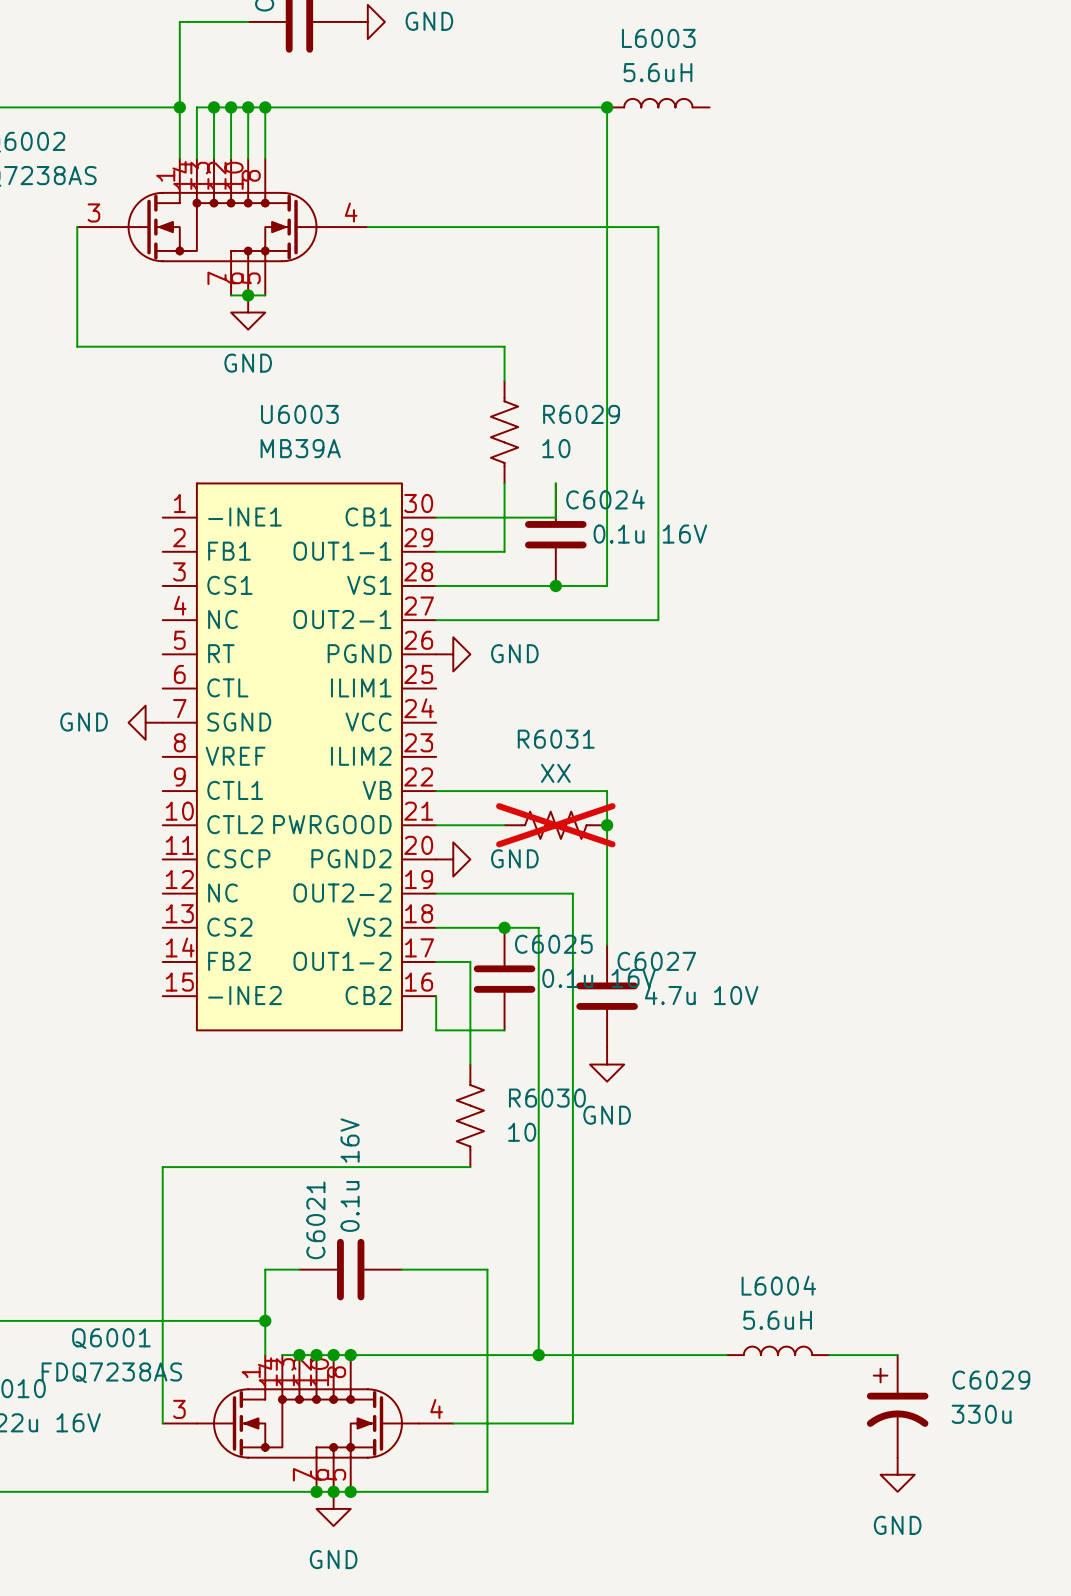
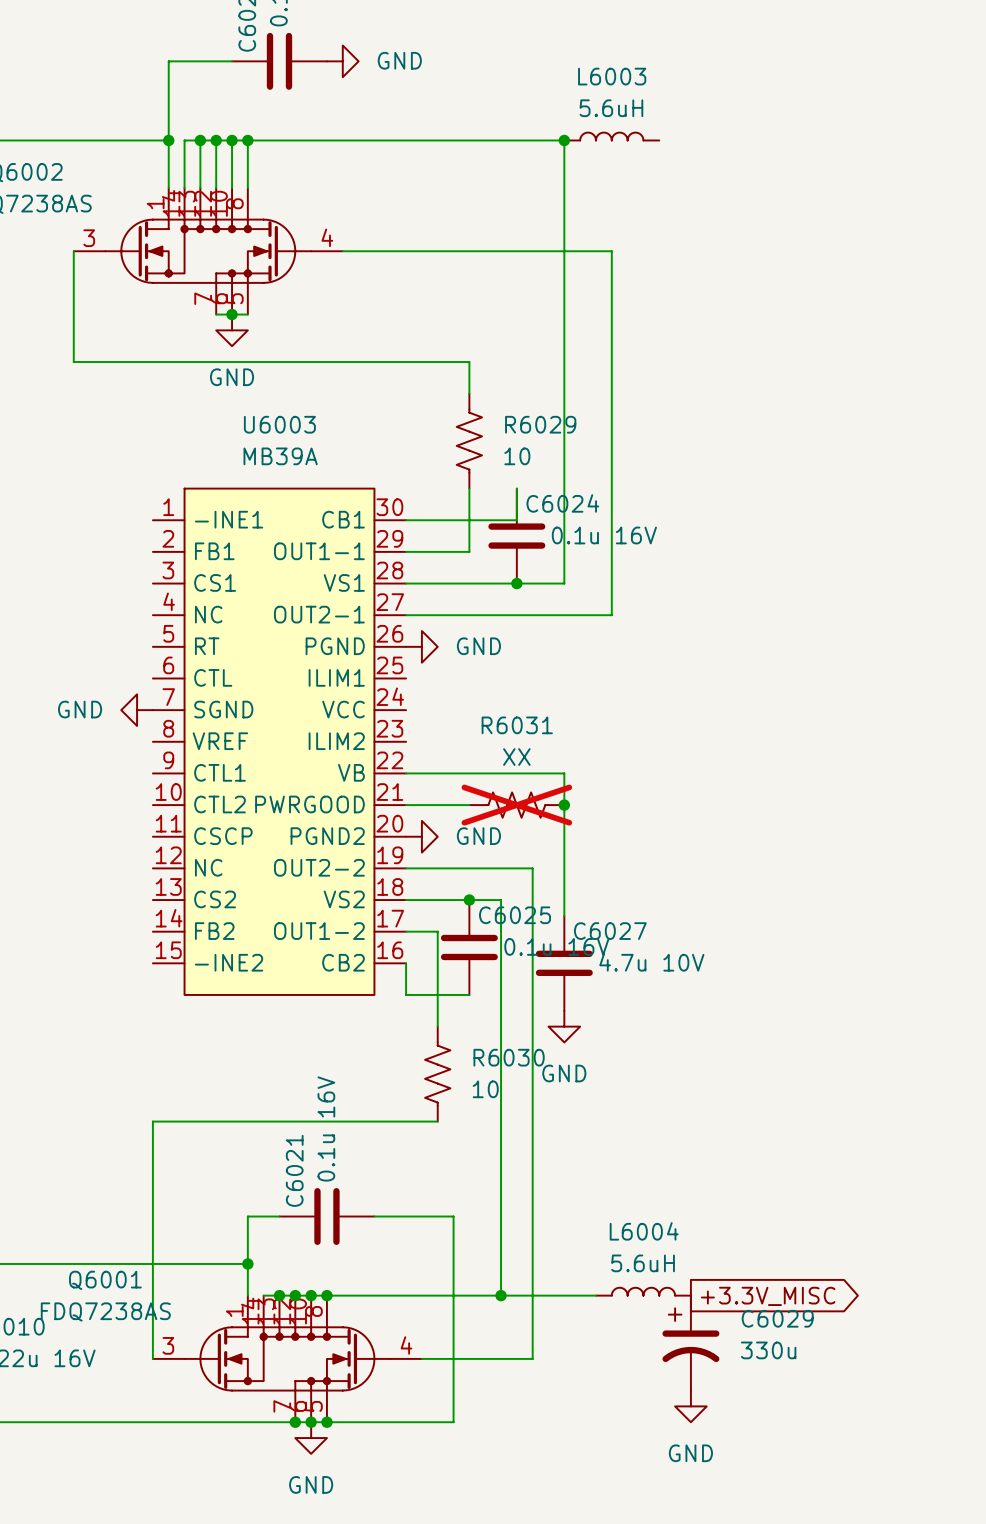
L6004 position: (778, 1350) -> (643, 1291)
wire: (641, 1355) (726, 1355) -> none
global label: none -> +3.3V_MISC (768, 1296)
wire: (829, 1355) (897, 1355) -> none
C6029 position: (897, 1406) -> (690, 1343)
power symbol position: GND (897, 1474) -> GND (690, 1406)

